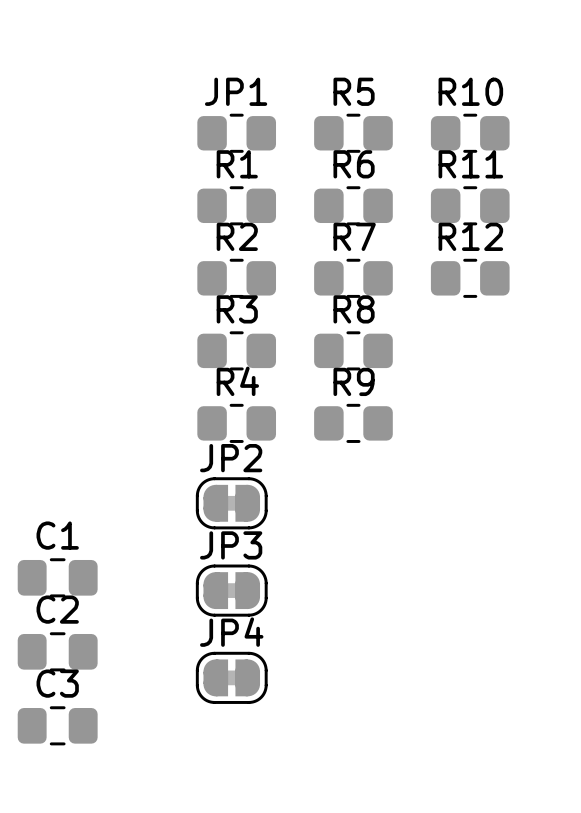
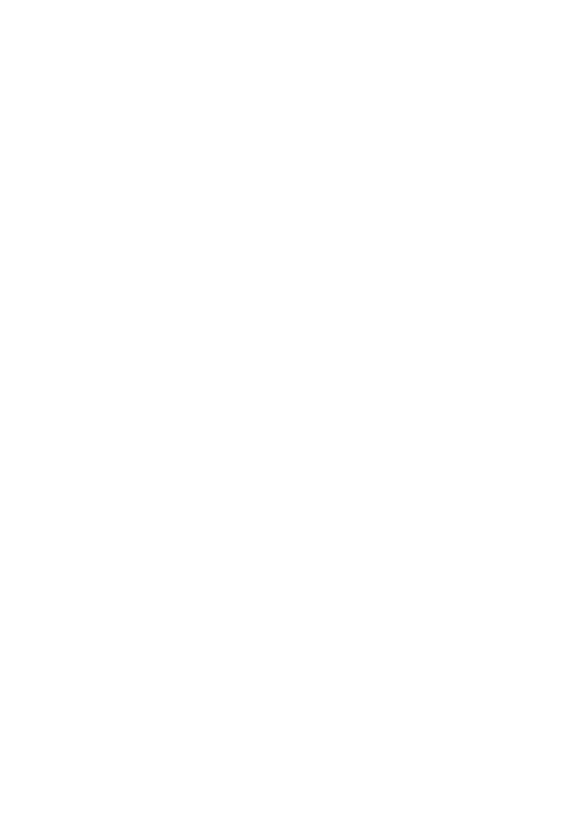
JP1: (236, 133) -> none
R5: (353, 133) -> none
R10: (470, 133) -> none
R1: (236, 205) -> none
R6: (353, 205) -> none
R11: (470, 205) -> none
R2: (236, 278) -> none
R7: (353, 278) -> none
R12: (470, 278) -> none
R3: (236, 350) -> none
R8: (353, 350) -> none
R4: (236, 423) -> none
R9: (353, 423) -> none
JP2: (231, 503) -> none
C1: (57, 577) -> none
JP3: (231, 590) -> none
C2: (57, 651) -> none
JP4: (231, 677) -> none
C3: (57, 725) -> none

